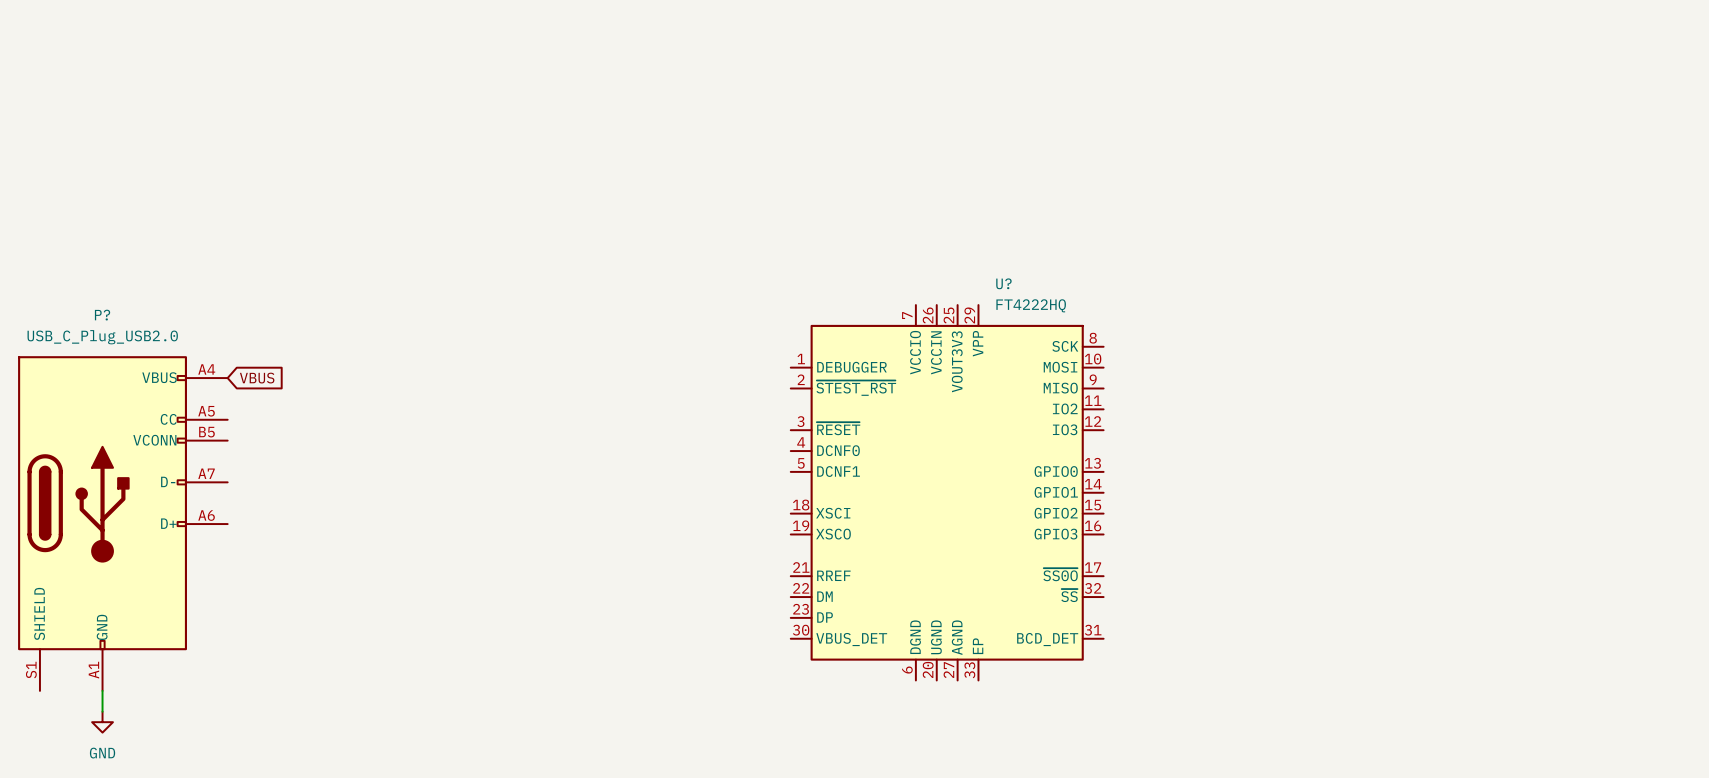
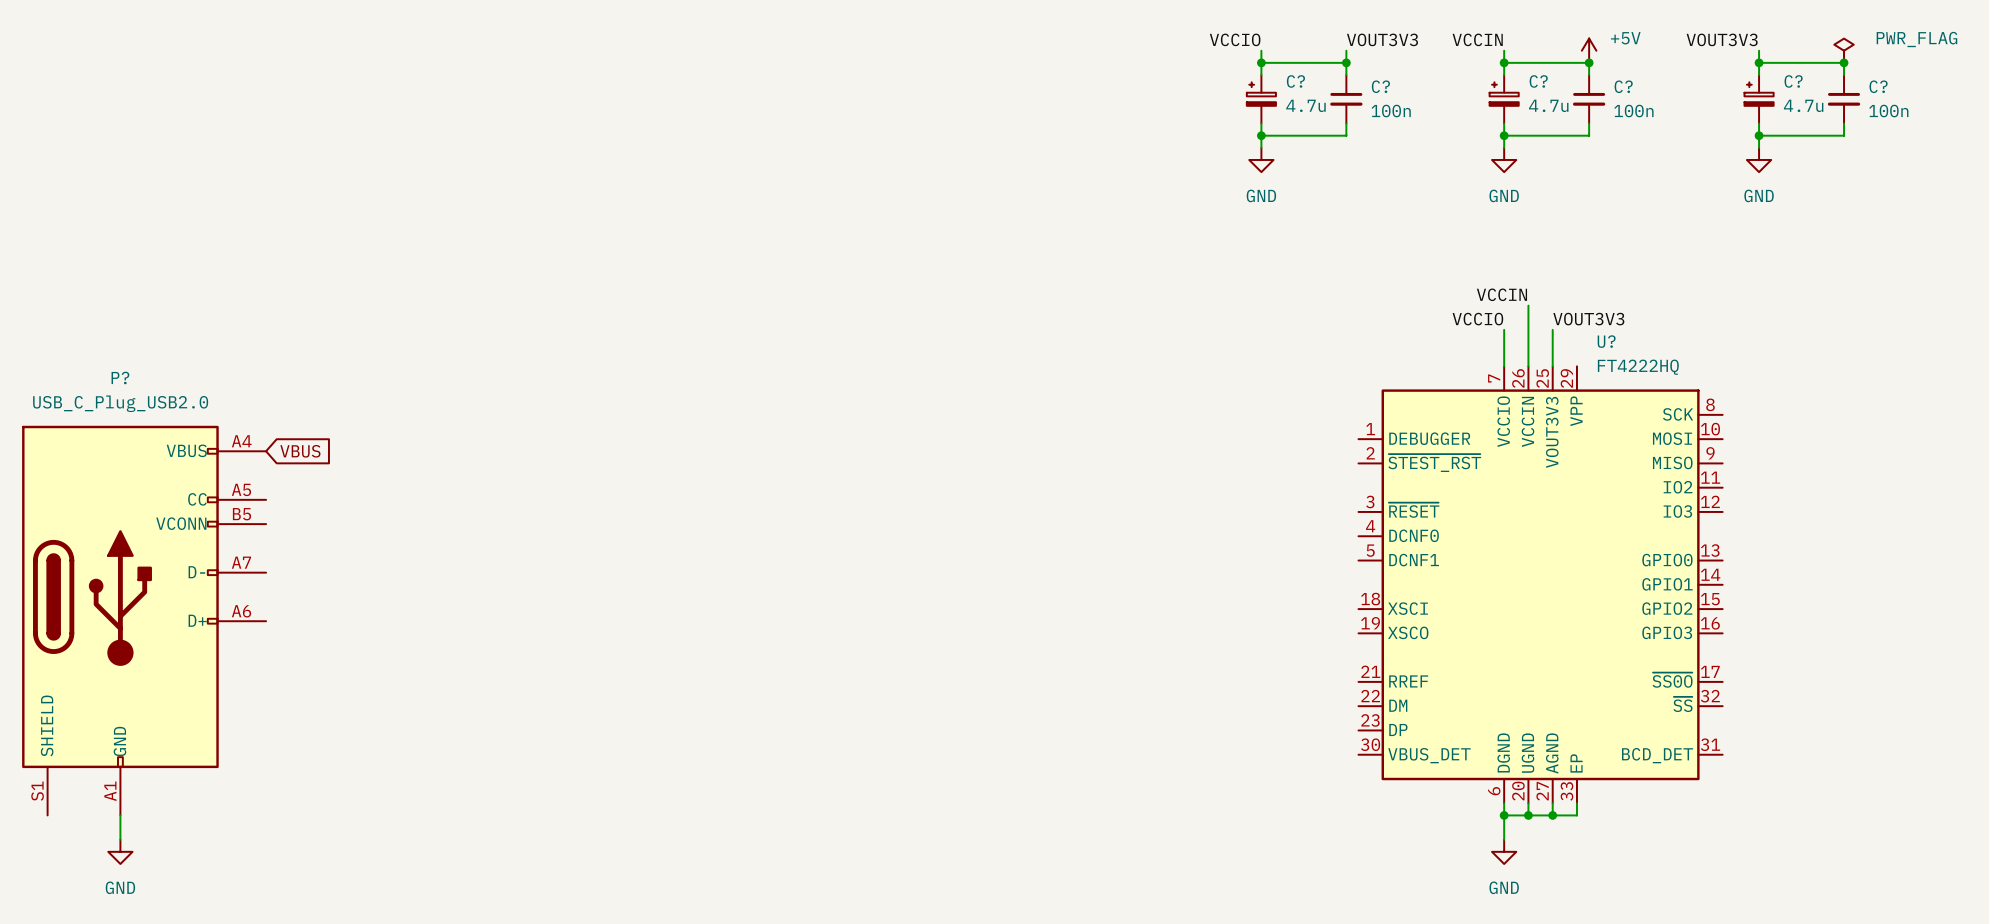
label: none -> VCCIO (1235, 39)
label: none -> VOUT3V3 (1382, 39)
label: none -> VCCIN (1477, 39)
label: none -> VOUT3V3 (1722, 39)
wire: none -> (1261, 50) (1261, 75)
wire: none -> (1346, 50) (1346, 75)
wire: none -> (1504, 50) (1504, 75)
power symbol: none -> +5V (1589, 50)
wire: none -> (1759, 50) (1759, 75)
power symbol: none -> PWR_FLAG (1844, 50)
wire: none -> (1261, 62) (1346, 62)
junction: none -> (1261, 62)
junction: none -> (1346, 62)
wire: none -> (1504, 62) (1589, 62) (1589, 75)
junction: none -> (1504, 62)
junction: none -> (1589, 62)
wire: none -> (1759, 62) (1844, 62) (1844, 75)
junction: none -> (1759, 62)
junction: none -> (1844, 62)
C?: none -> 4.7u (1261, 99)
C?: none -> 100n (1346, 99)
C?: none -> 4.7u (1504, 99)
C?: none -> 100n (1589, 99)
C?: none -> 4.7u (1759, 99)
C?: none -> 100n (1844, 99)
wire: none -> (1261, 123) (1261, 147)
wire: none -> (1346, 123) (1346, 135) (1261, 135)
wire: none -> (1504, 123) (1504, 147)
wire: none -> (1589, 123) (1589, 135) (1504, 135)
wire: none -> (1759, 123) (1759, 147)
wire: none -> (1844, 123) (1844, 135) (1759, 135)
junction: none -> (1261, 135)
junction: none -> (1504, 135)
junction: none -> (1759, 135)
power symbol: none -> GND (1261, 159)
power symbol: none -> GND (1504, 159)
power symbol: none -> GND (1759, 159)
label: none -> VCCIN (1501, 294)
wire: none -> (1528, 305) (1528, 366)
label: none -> VCCIO (1477, 319)
label: none -> VOUT3V3 (1588, 319)
wire: none -> (1504, 329) (1504, 366)
wire: none -> (1552, 329) (1552, 366)
U?: FT4222HQ (947, 492) -> none
U?: none -> FT4222HQ (1540, 584)
wire: none -> (1504, 803) (1504, 839)
wire: none -> (1528, 803) (1528, 815)
wire: none -> (1552, 803) (1552, 815)
wire: none -> (1576, 803) (1576, 815) (1504, 815)
junction: none -> (1504, 815)
junction: none -> (1528, 815)
junction: none -> (1552, 815)
power symbol: none -> GND (1504, 851)

